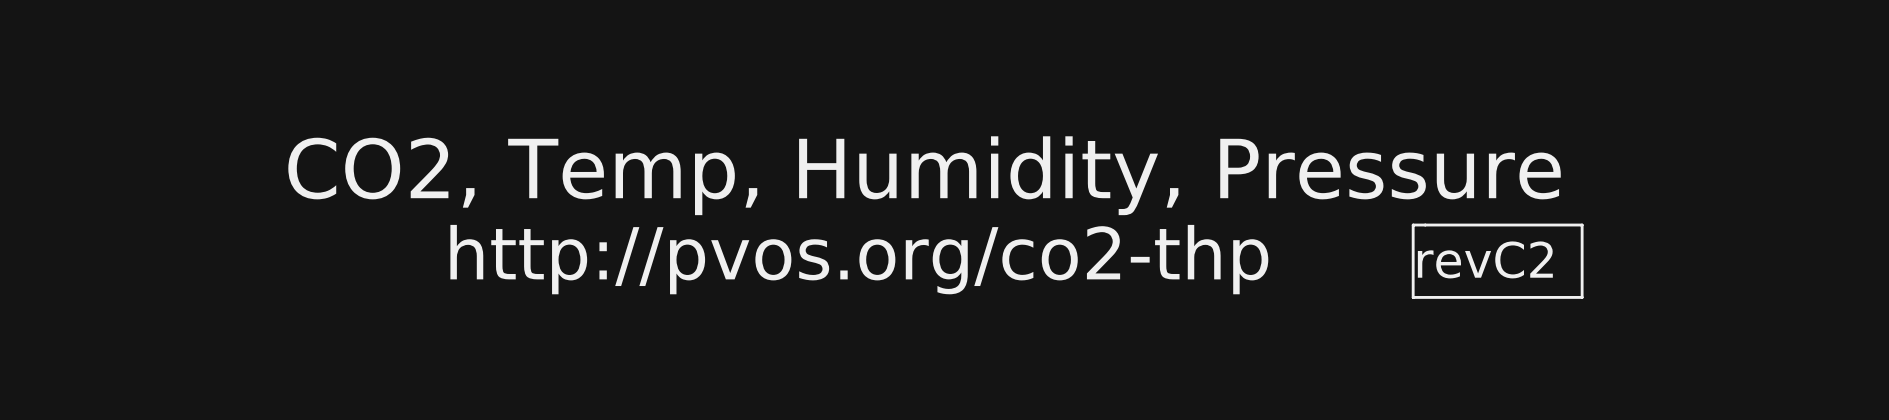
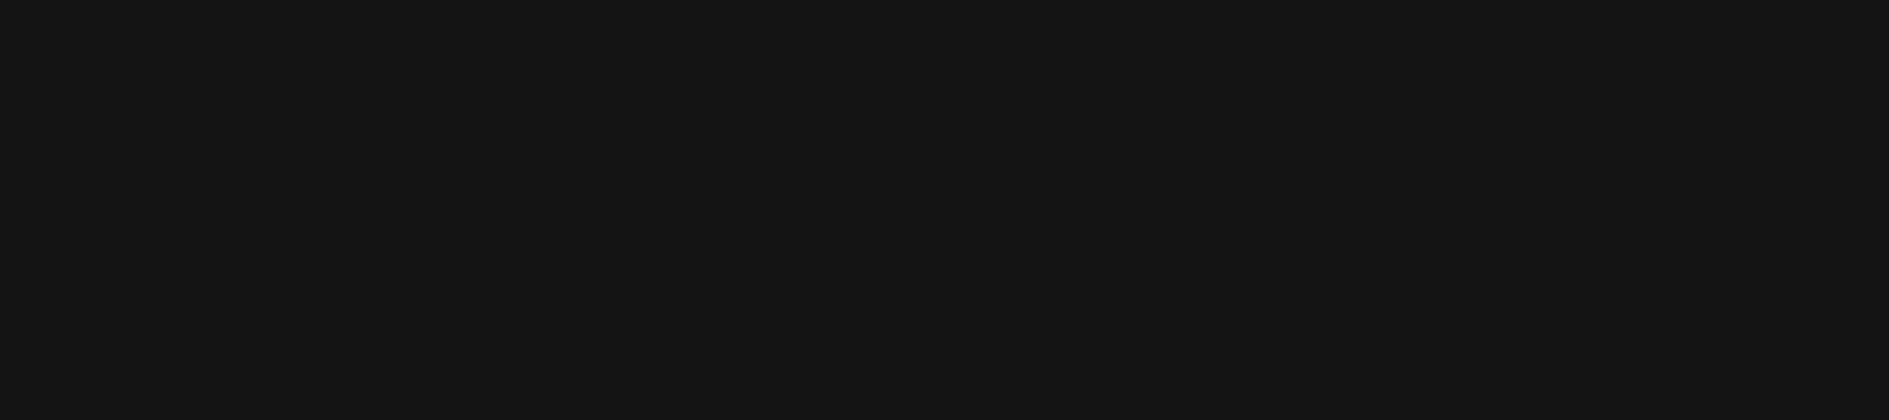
text: CO2, Temp, Humidity, Pressure (924, 175) -> none
line: (1413, 225) (1582, 225) (1582, 297) (1413, 297) (1413, 225) -> none
text: http://pvos.org/co2-thp (859, 259) -> none
text: revC2 (1485, 259) -> none

